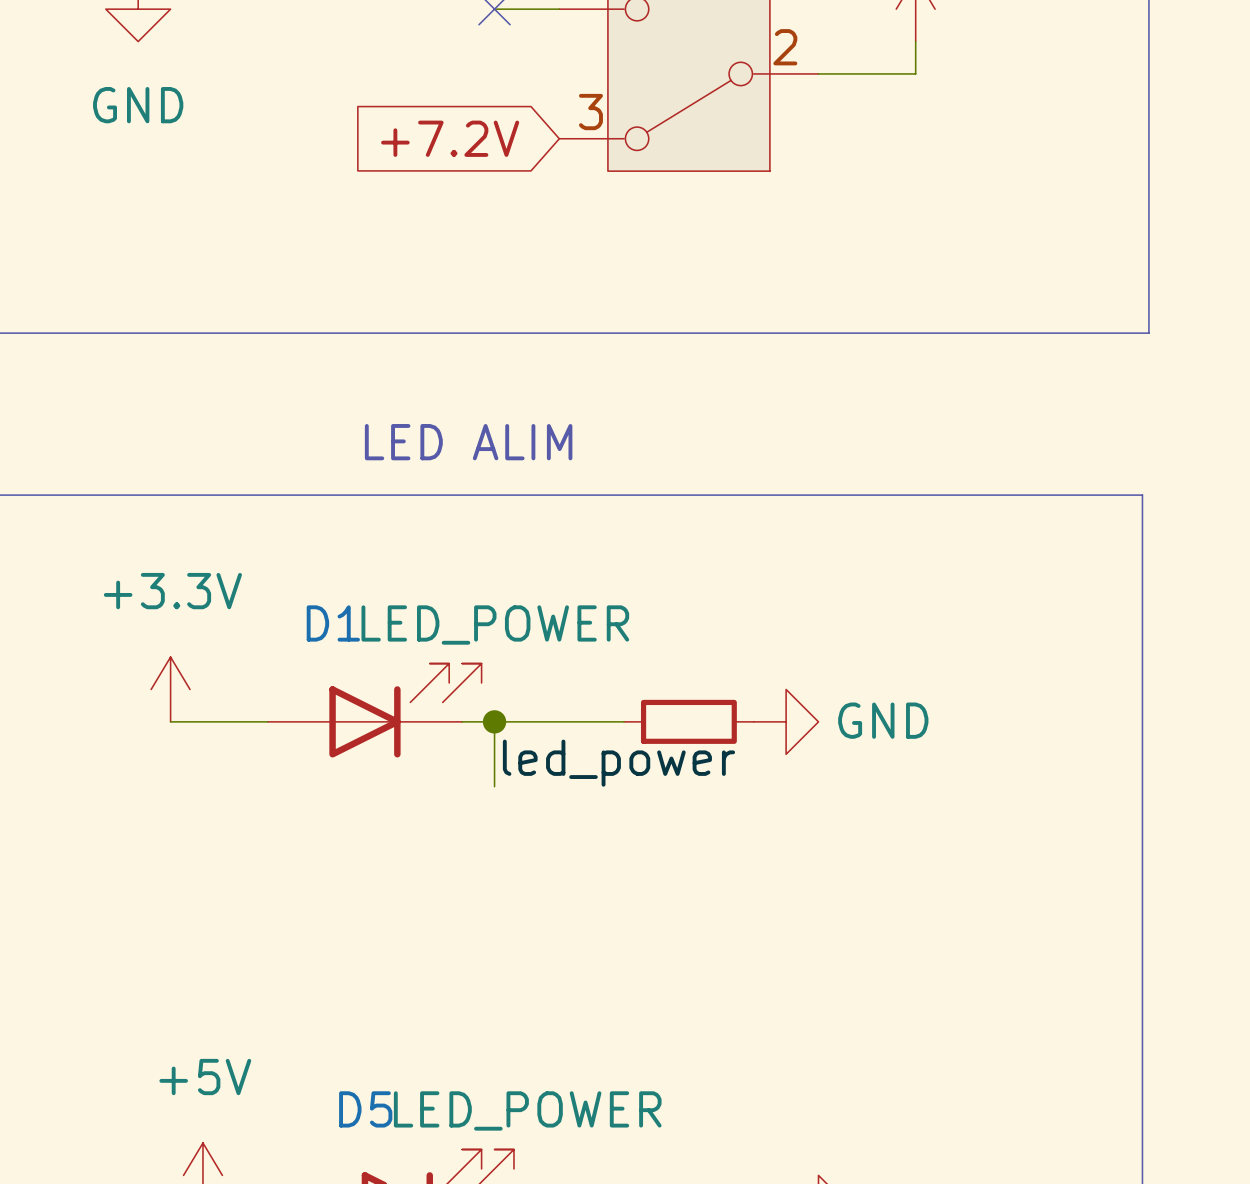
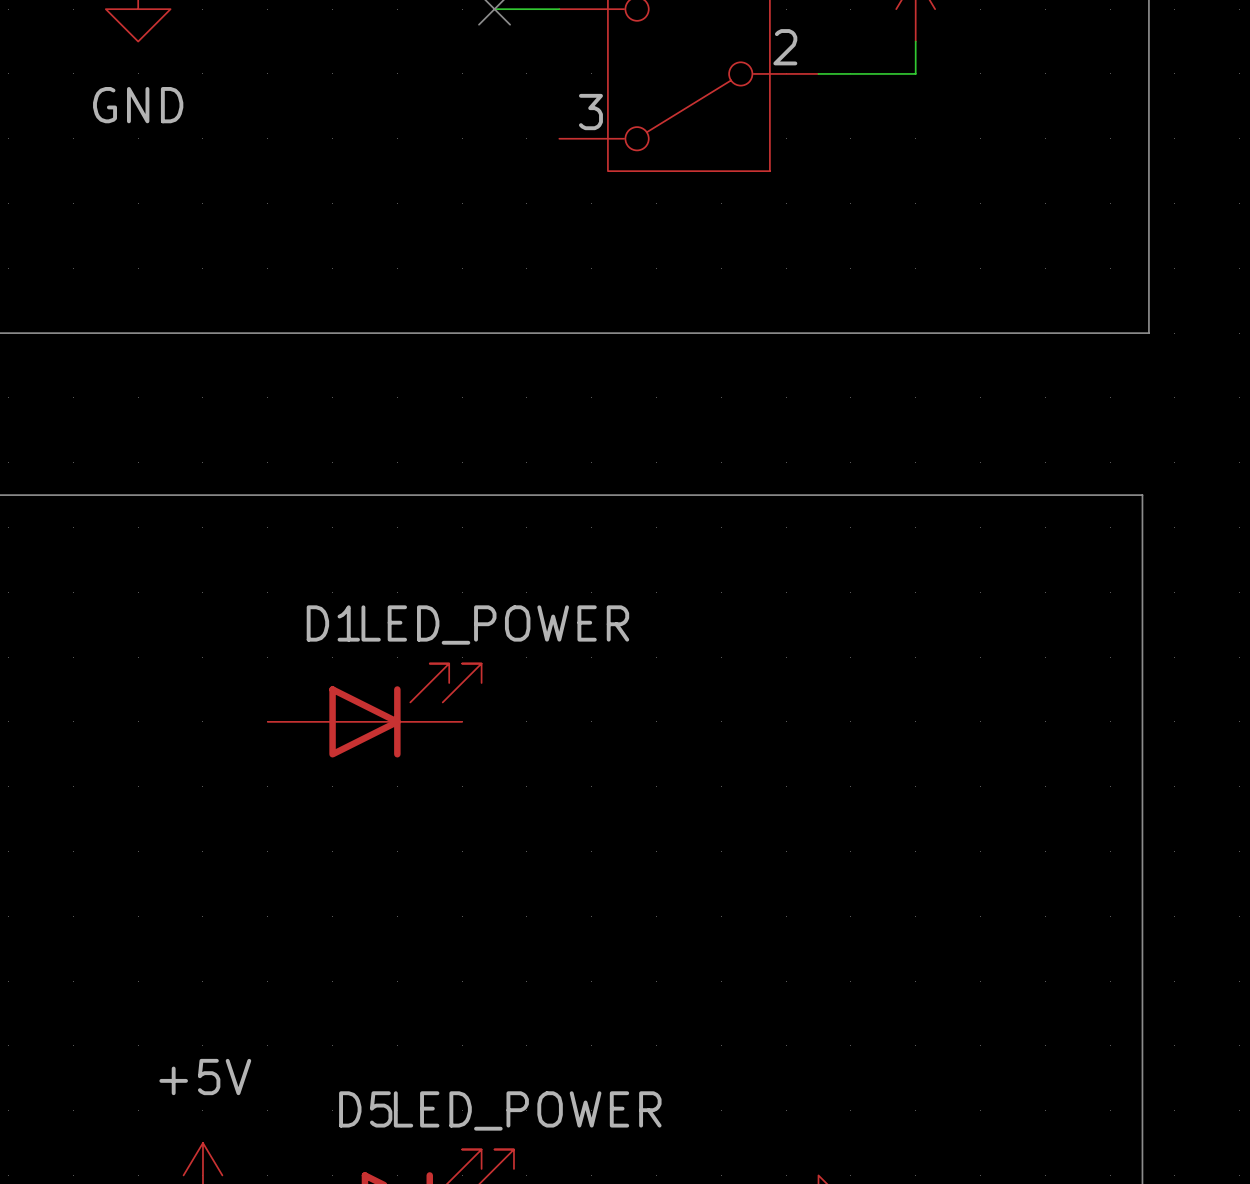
global label: +7.2V (450, 138) -> none
text: LED ALIM (468, 442) -> none
power symbol: +3.3V (170, 689) -> none
wire: (170, 721) (267, 721) -> none
wire: (462, 721) (624, 721) -> none
wire: (494, 721) (494, 786) -> none
junction: (494, 721) -> none
part: (688, 721) -> none
power symbol: GND (786, 721) -> none
label: led_power (618, 763) -> none

